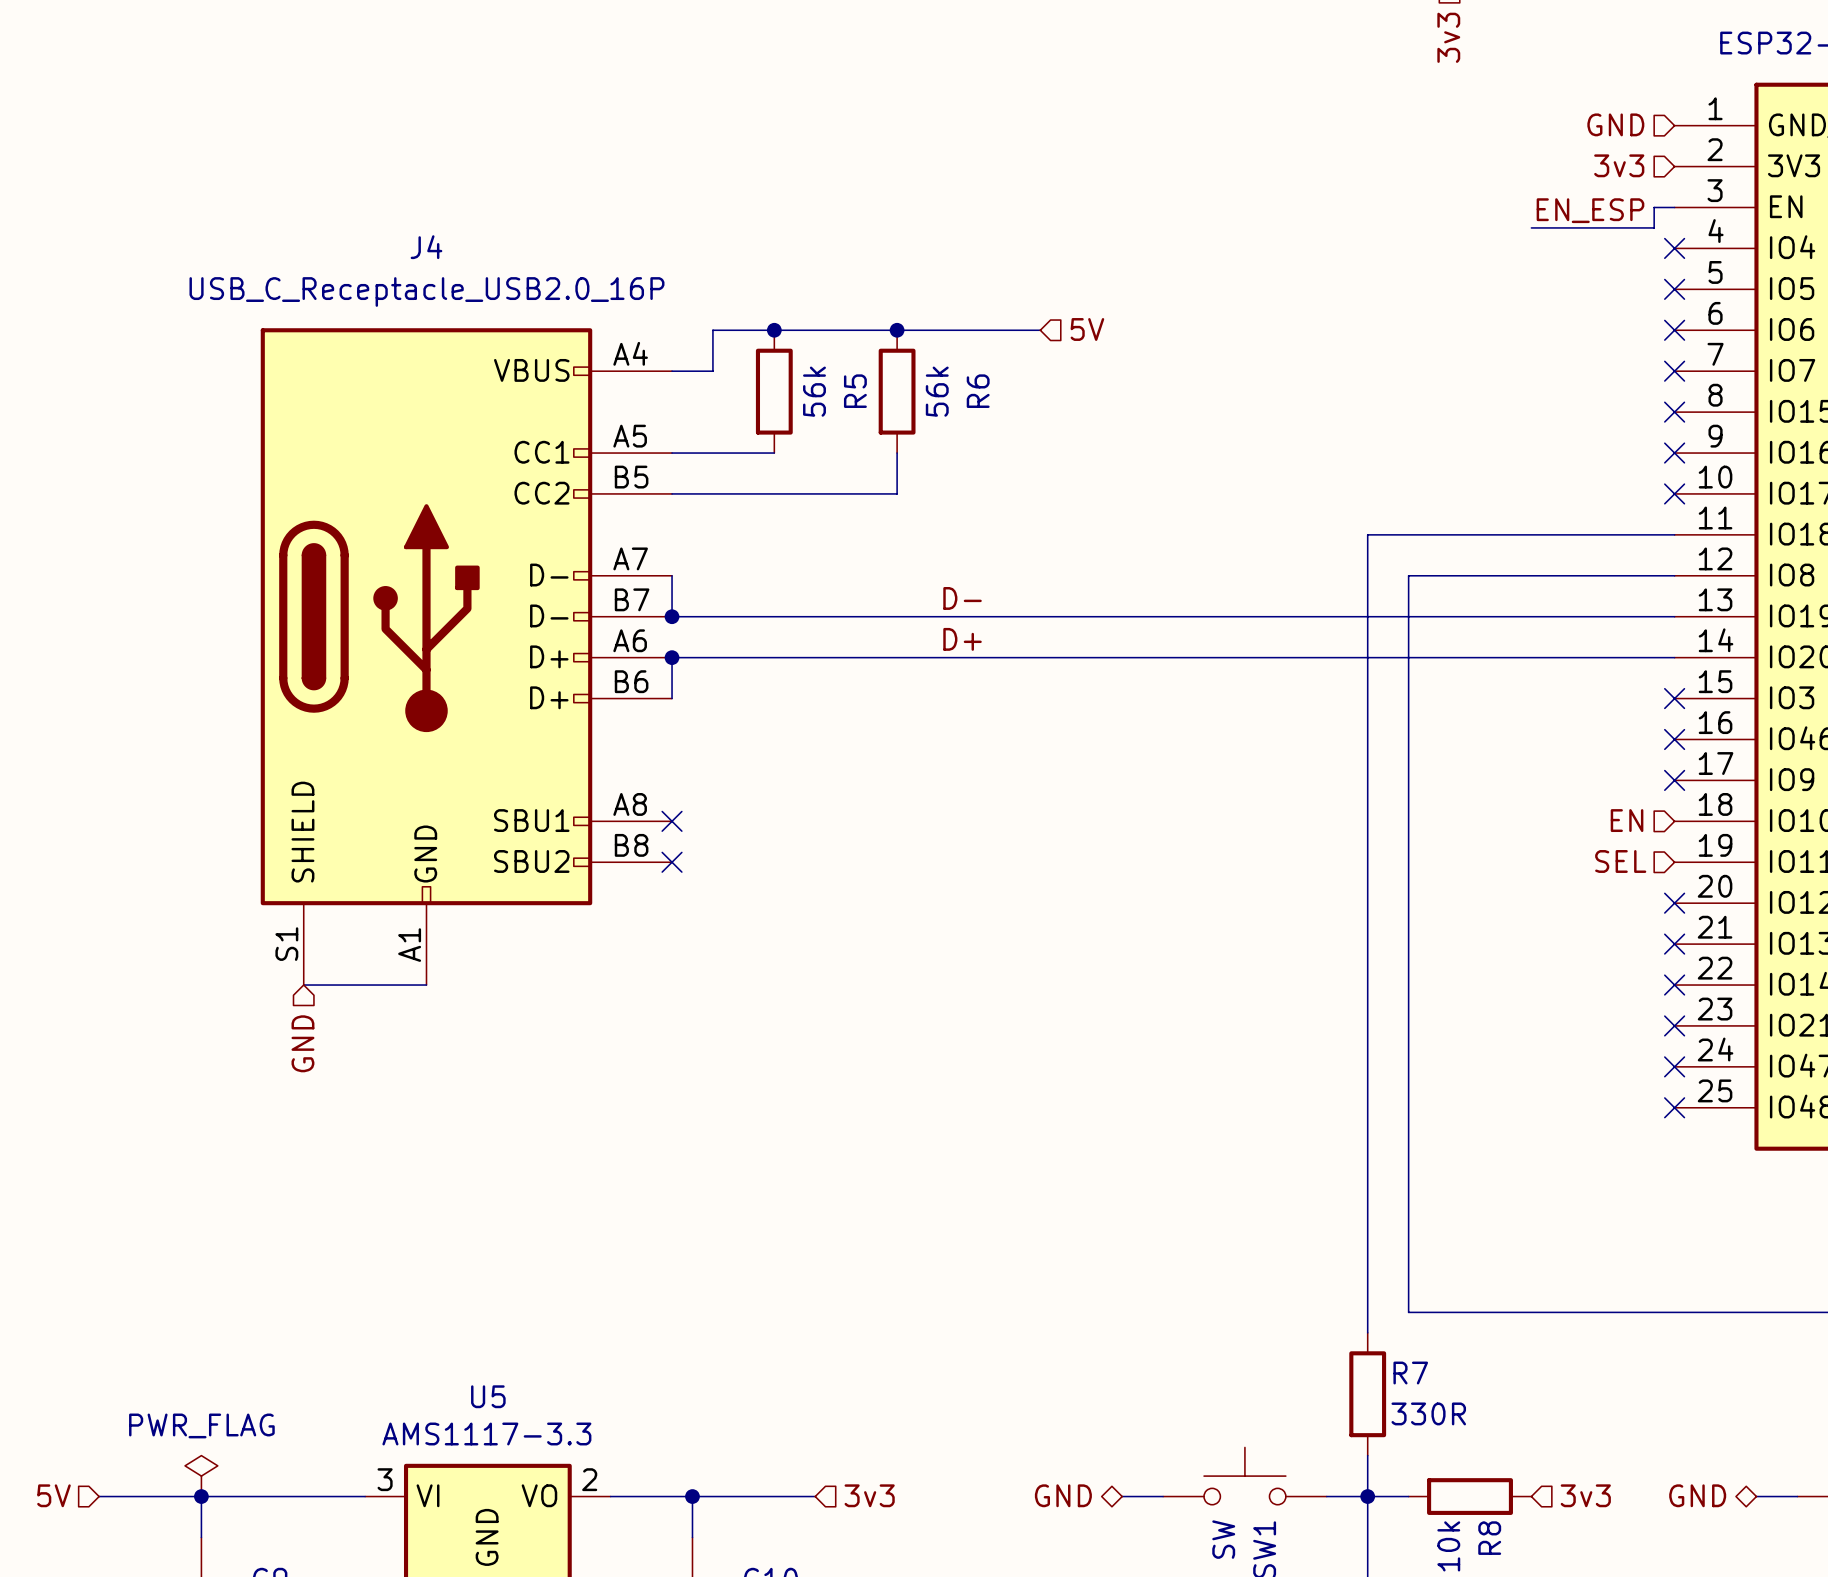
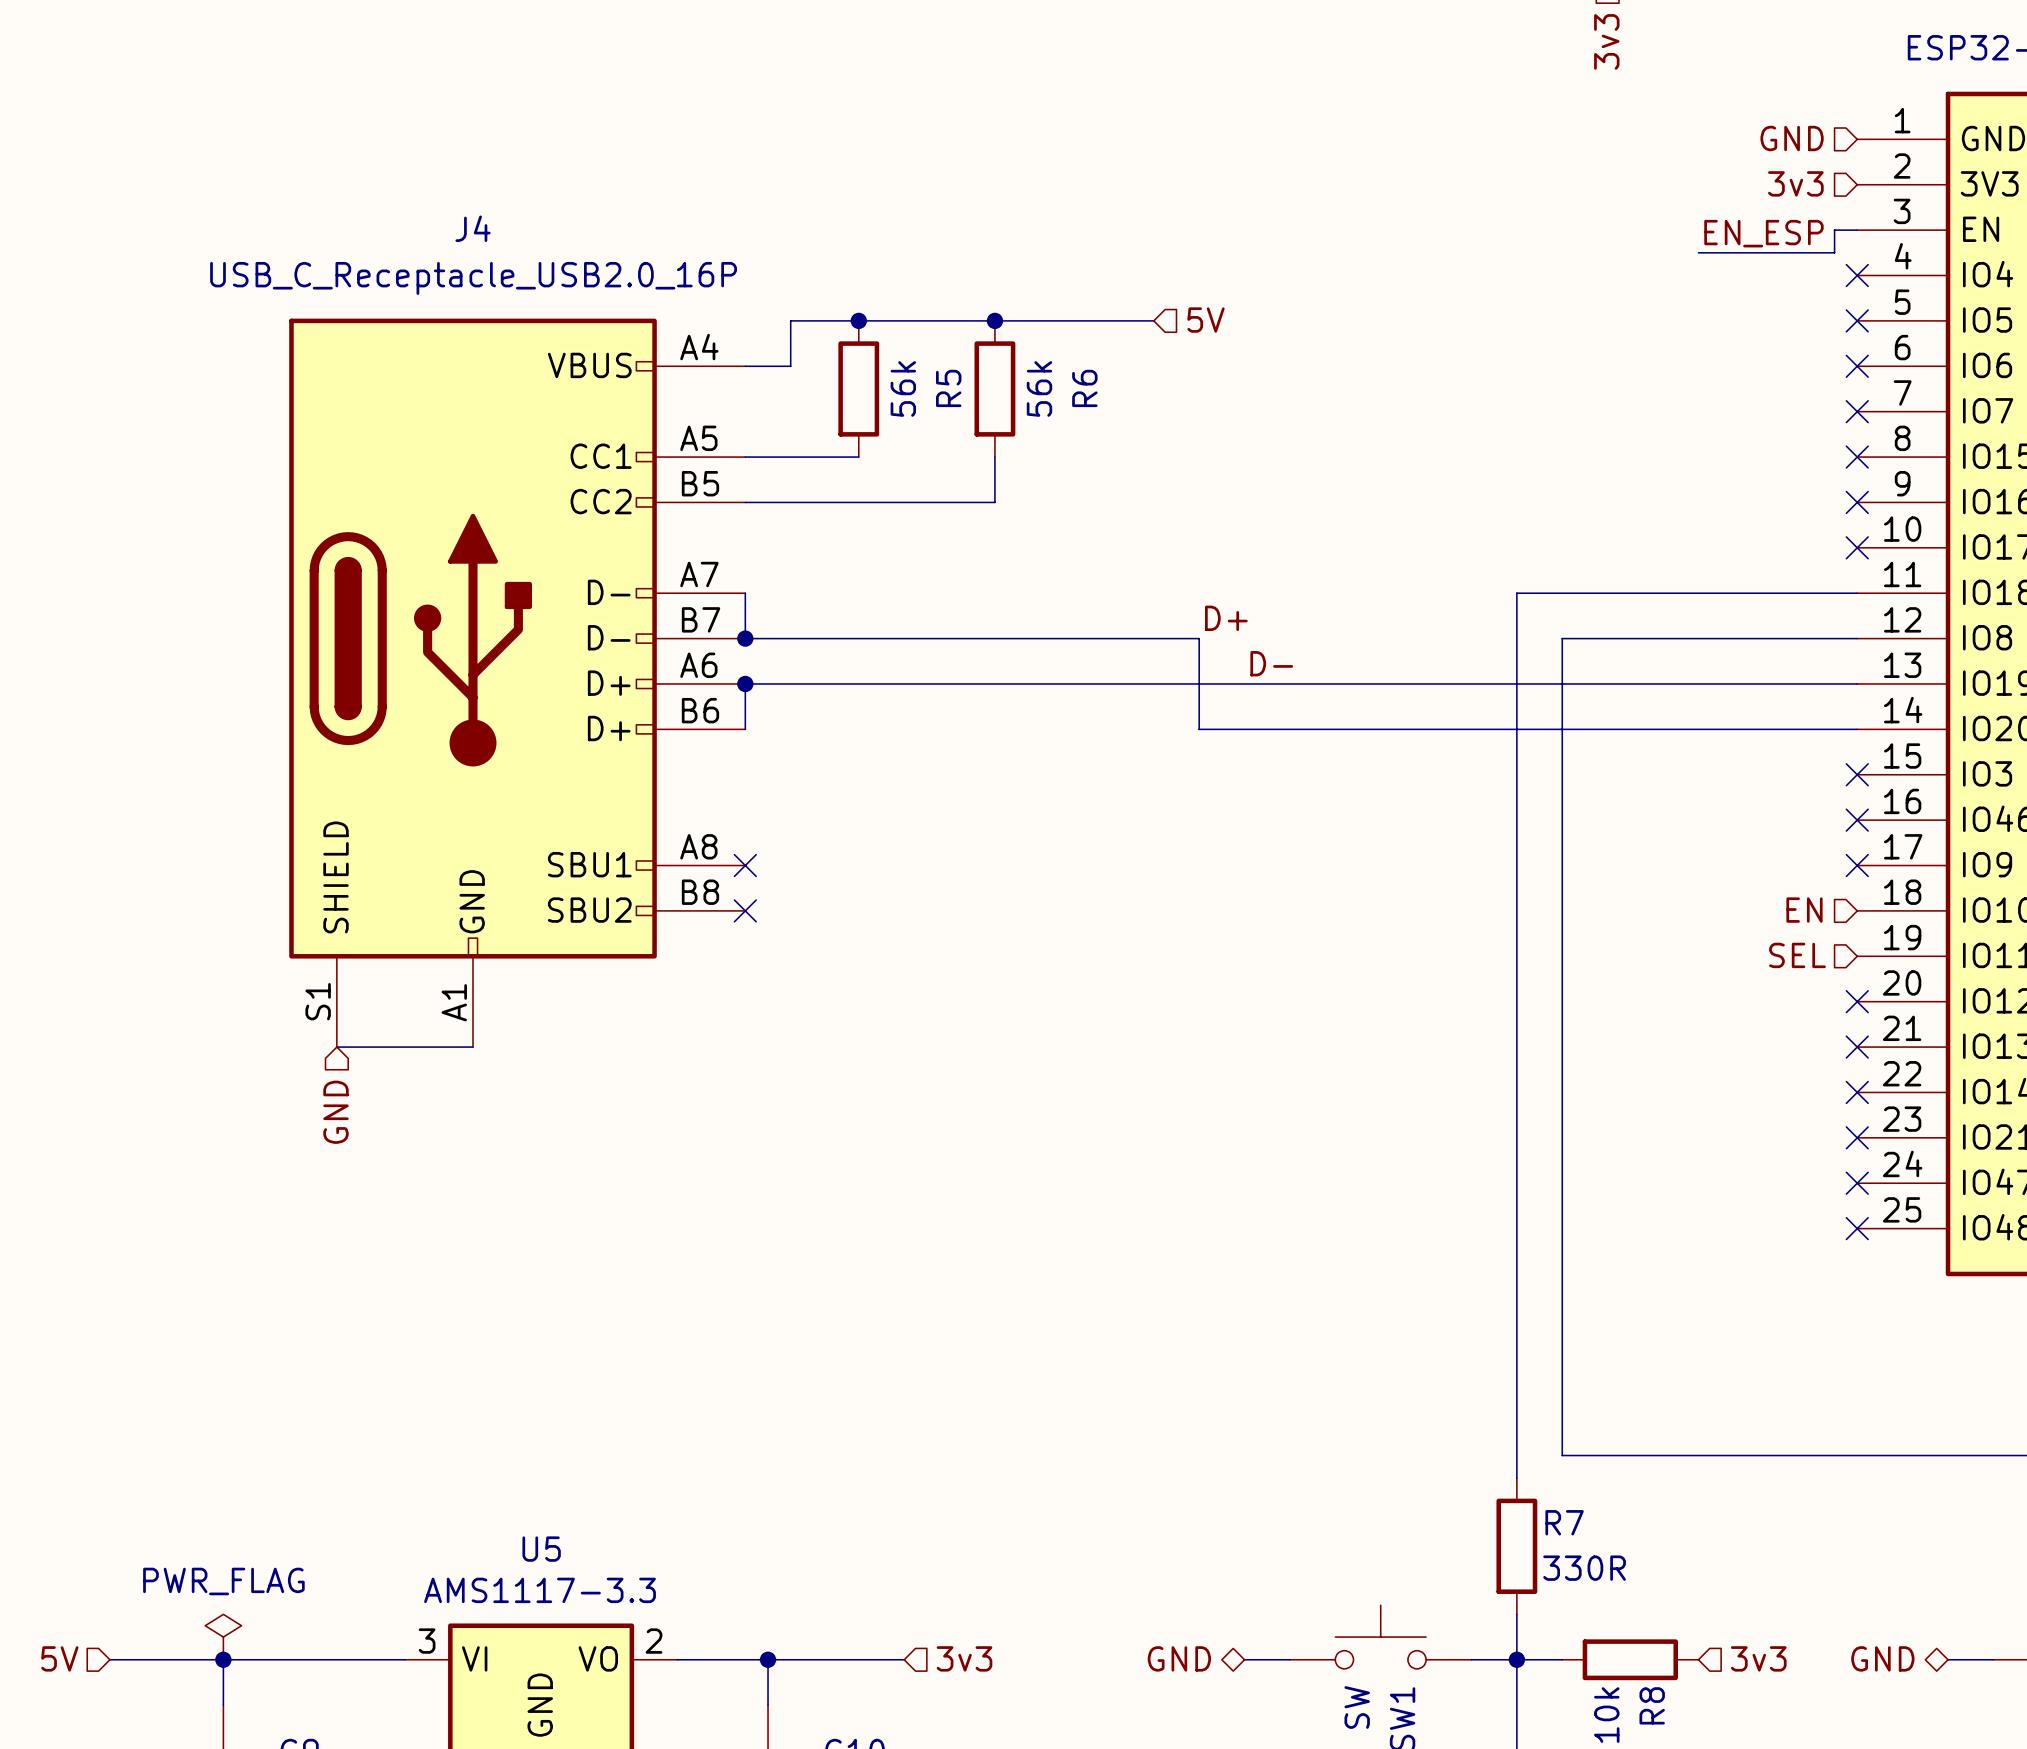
hierarchical label position: 5V (1087, 329) -> 5V (1206, 320)
junction position: (774, 330) -> (858, 320)
junction position: (897, 330) -> (994, 320)
wire: (1040, 330) (712, 330) (712, 371) (672, 371) -> (1153, 320) (790, 320) (790, 366) (745, 366)
R5 position: (774, 391) -> (858, 388)
R6 position: (897, 391) -> (994, 388)
wire: none -> (745, 457) (858, 457)
wire: none -> (994, 457) (994, 502) (858, 502)
wire: (897, 453) (897, 493) (672, 493) -> none
wire: (672, 575) (672, 616) -> (745, 729) (745, 683)
label position: D- (962, 598) -> D- (1271, 663)
label position: D+ (962, 639) -> D+ (1226, 618)
J4 position: (466, 656) -> (517, 682)
junction position: (672, 657) -> (745, 638)
wire: (1081, 657) (672, 657) (672, 698) -> (1199, 729) (1199, 638) (745, 638) (745, 593)
no-connect mark position: (672, 862) -> (745, 865)
wire: (303, 985) (426, 985) -> (336, 1047) (473, 1047)
hierarchical label position: GND (302, 1043) -> GND (336, 1112)

